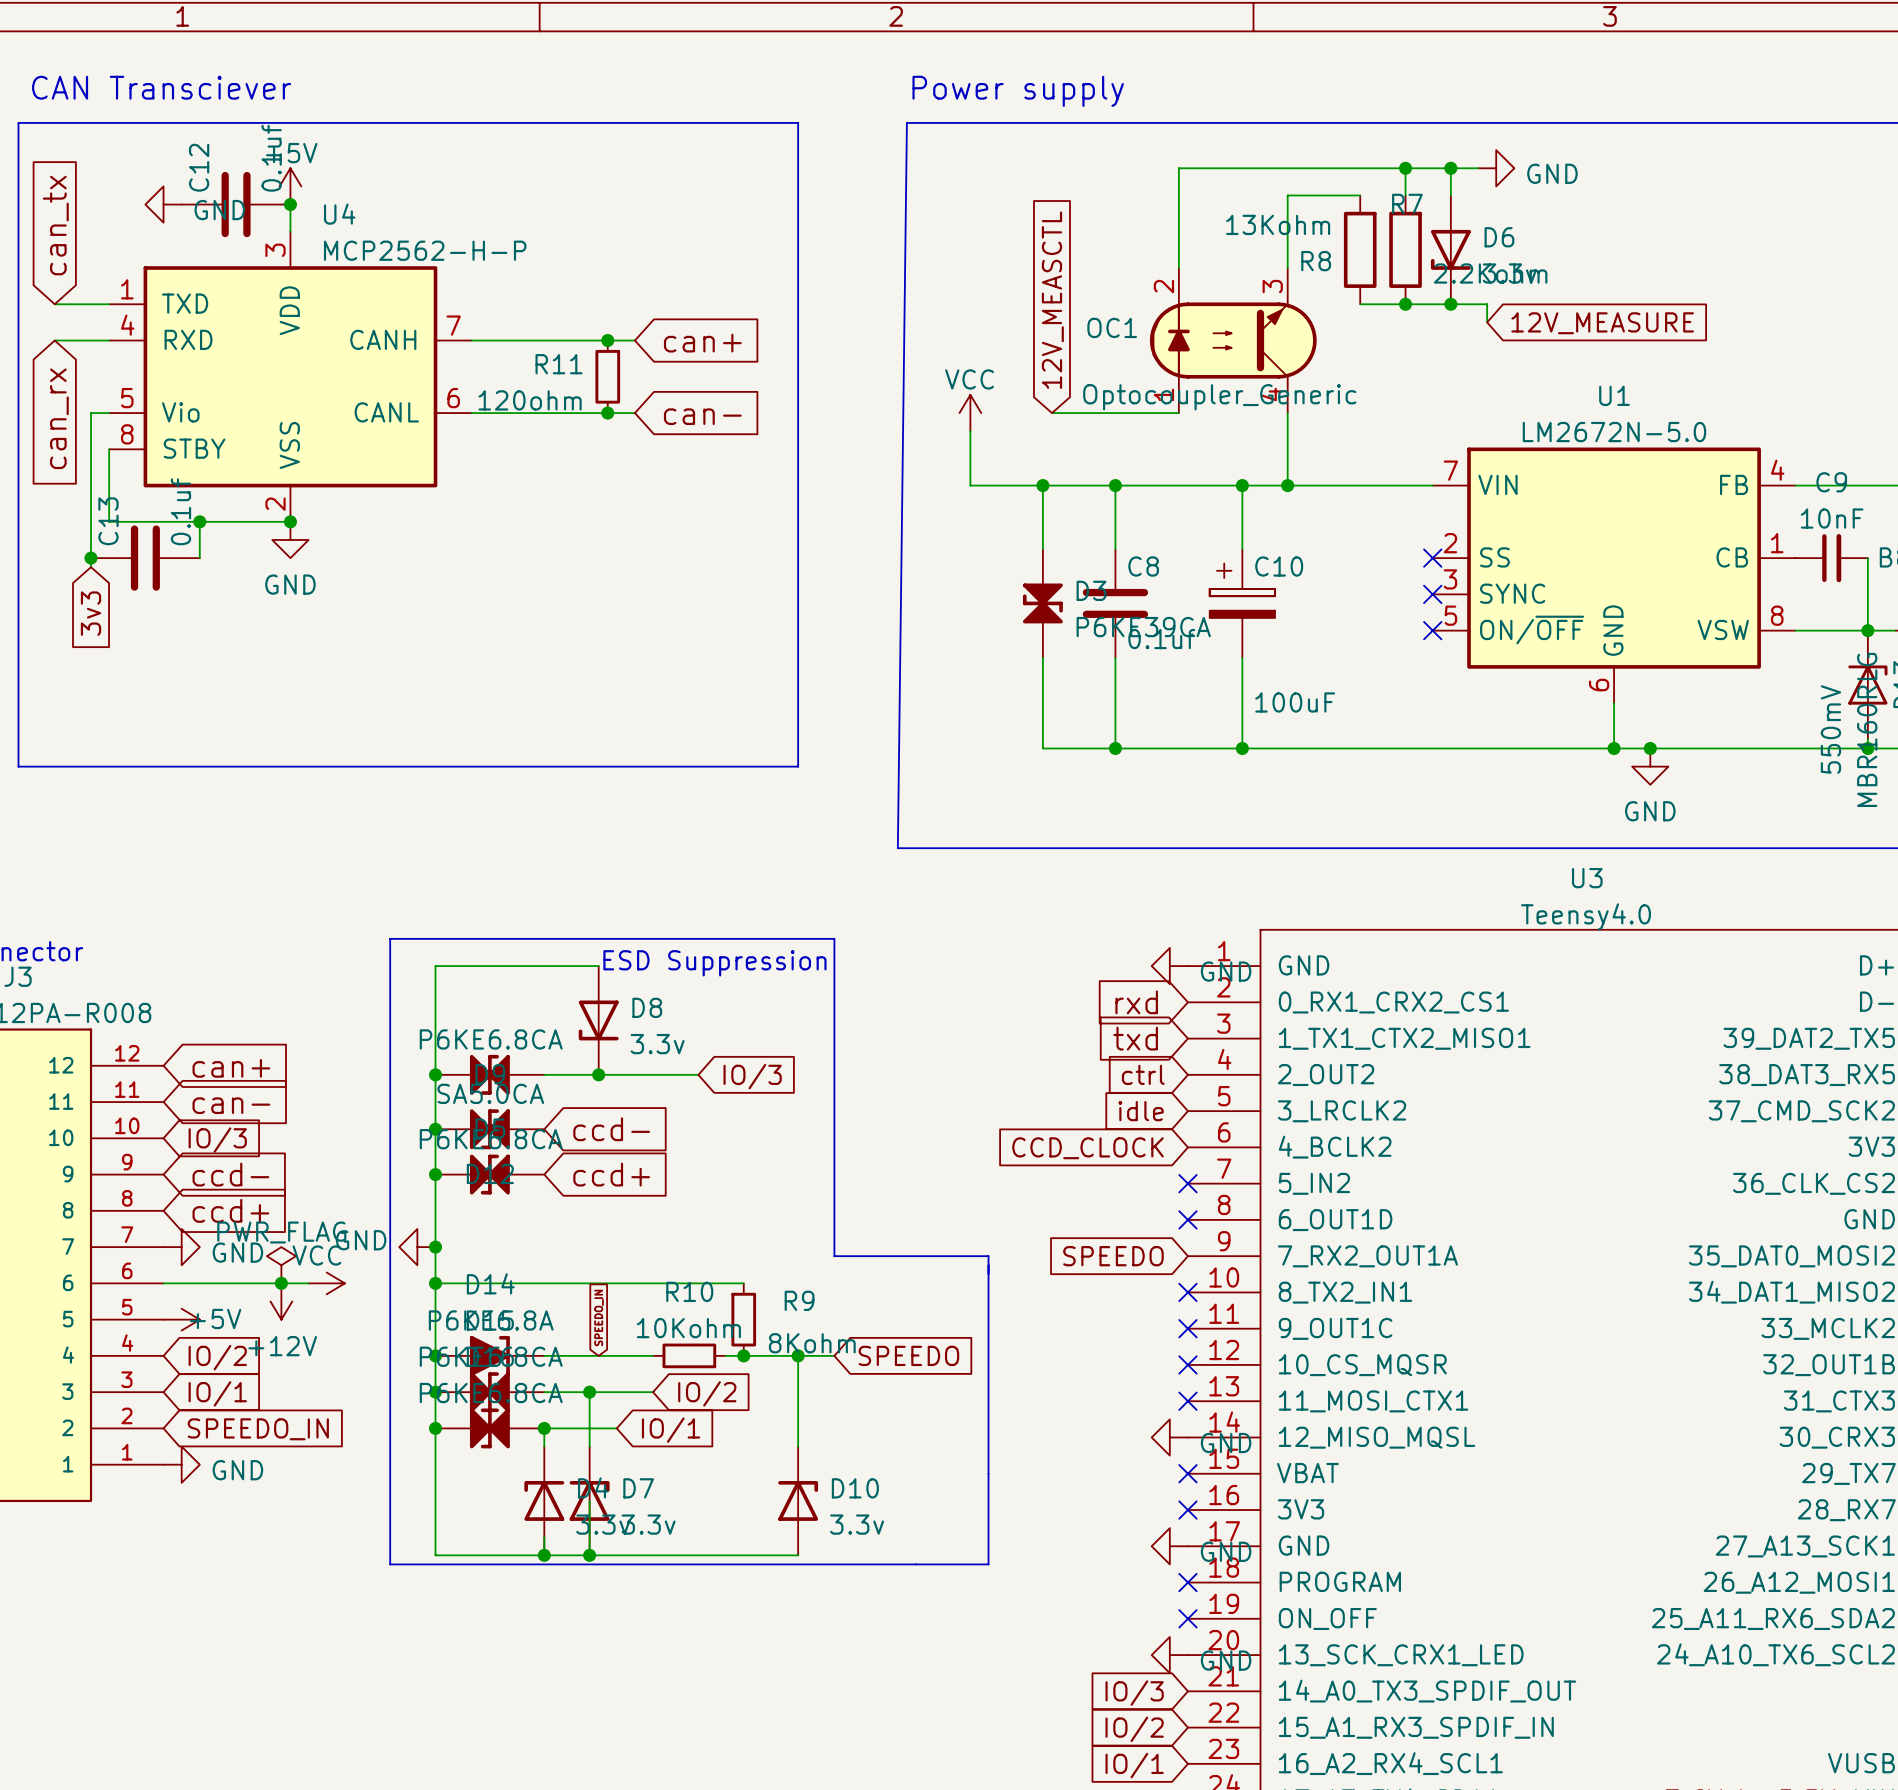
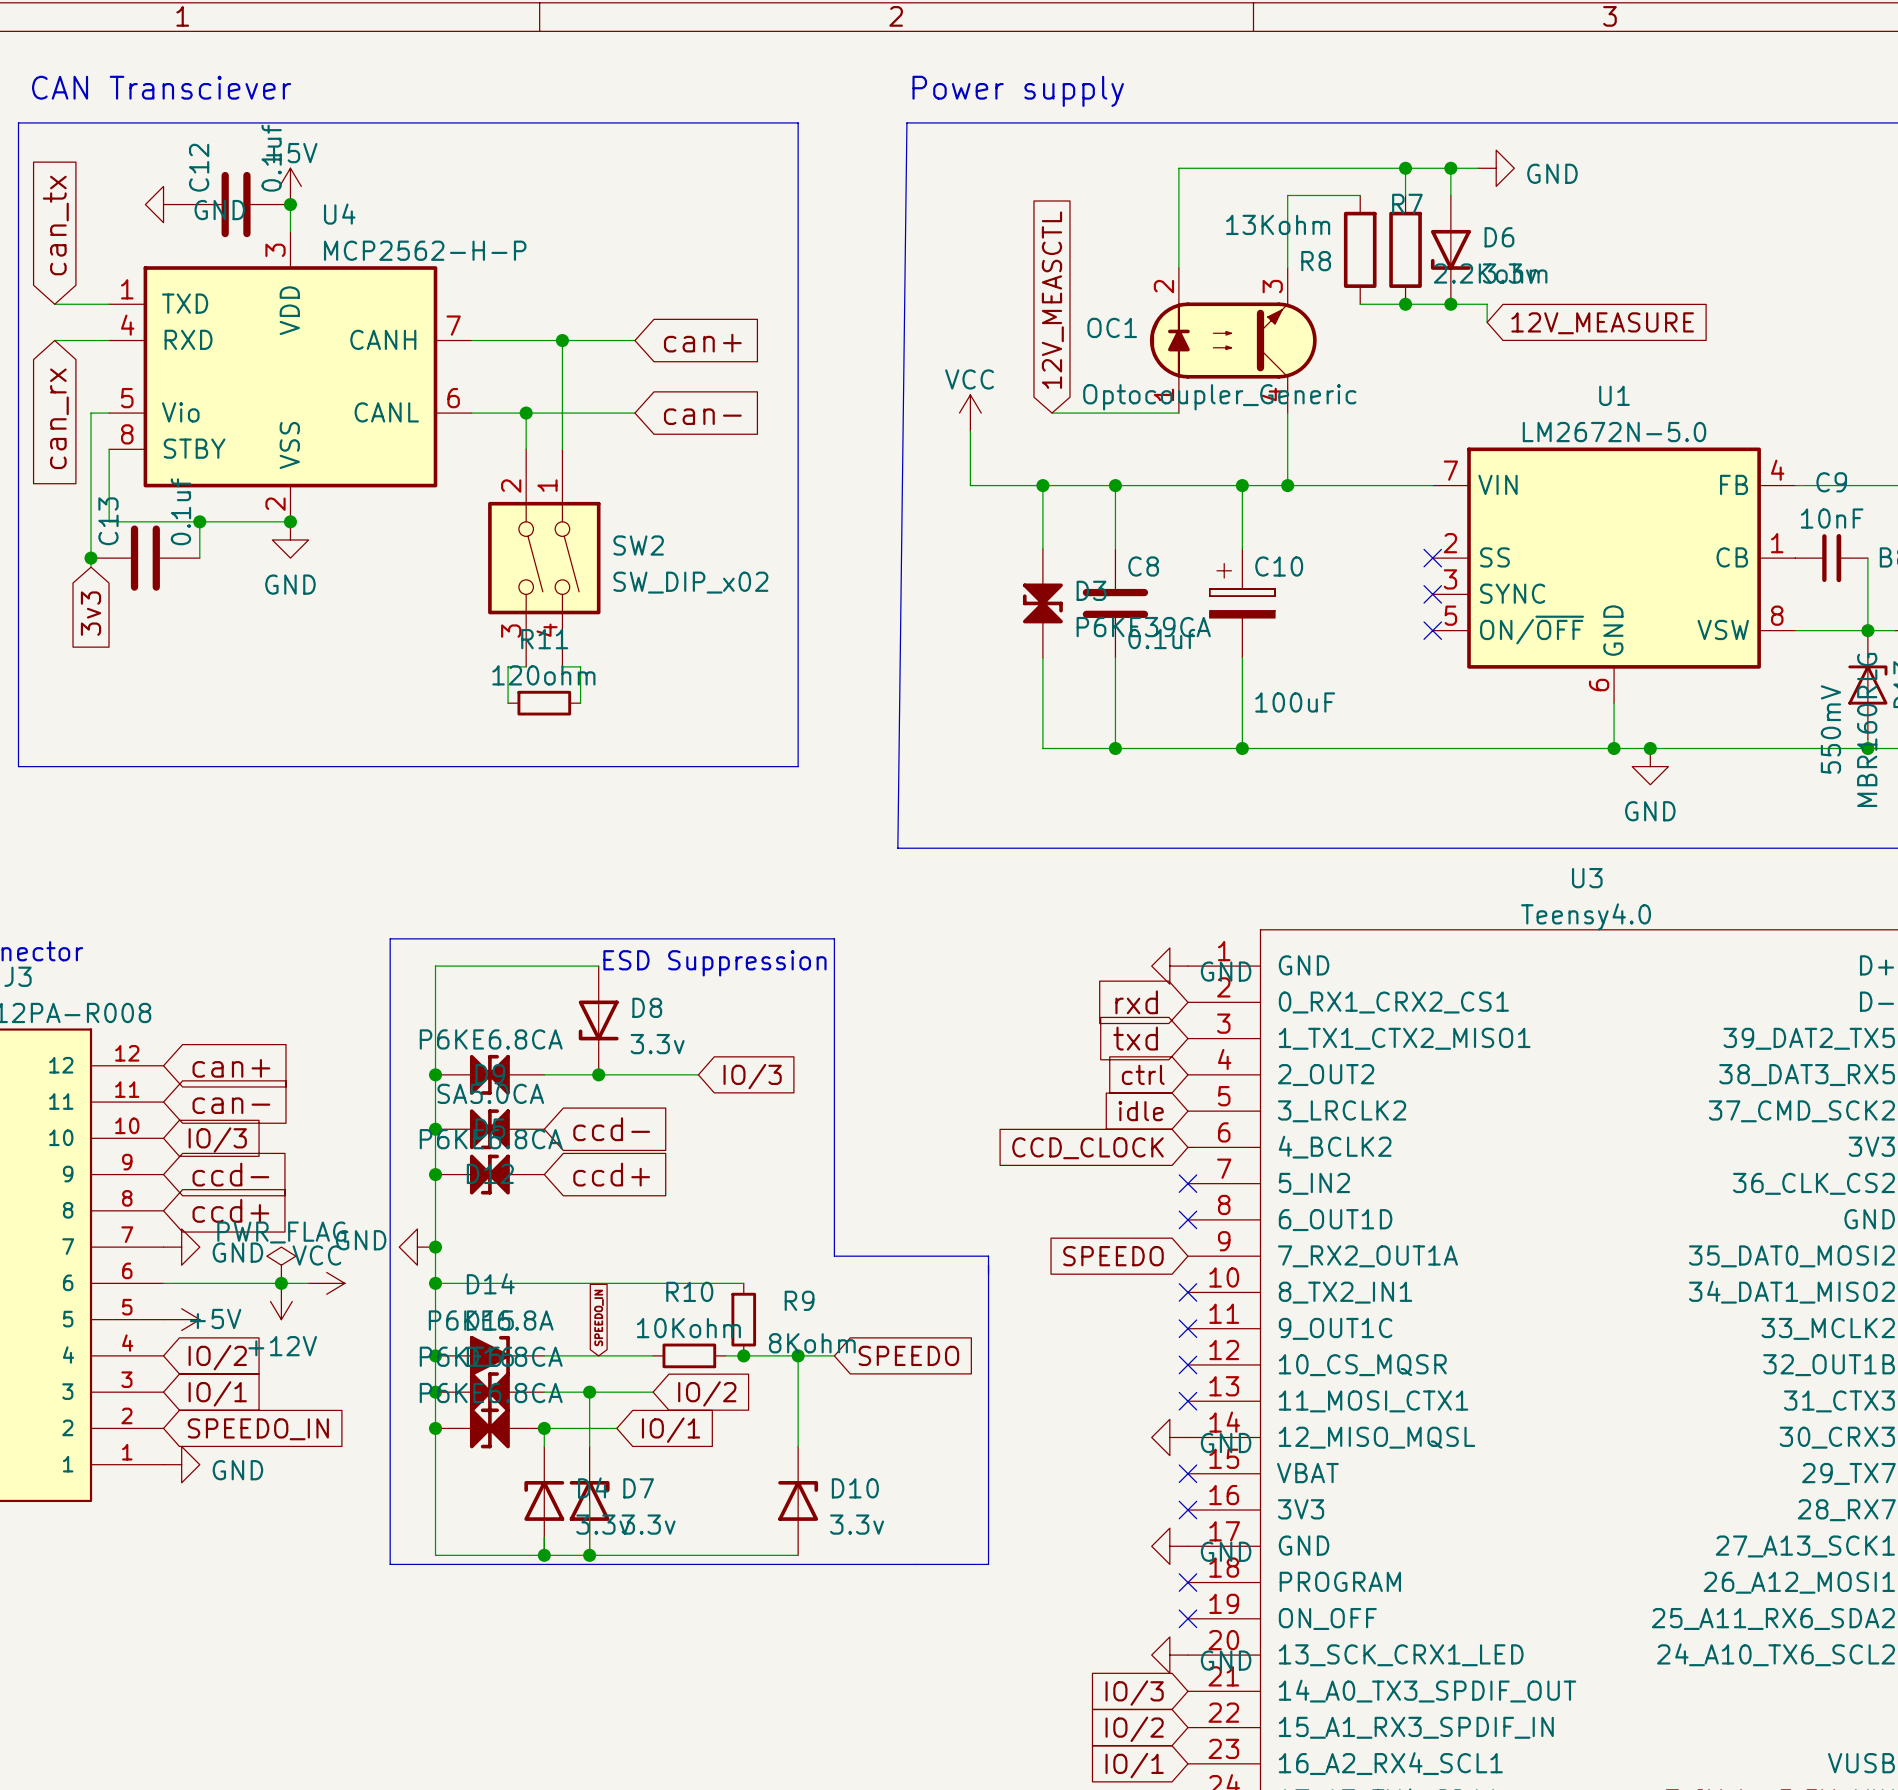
wire: none -> (562, 340) (562, 449)
junction: none -> (562, 340)
junction: (607, 340) -> none
R11 rotation: 0° (607, 376) -> 90° clockwise (544, 703)
R11 position: (607, 376) -> (544, 703)
R11 value position: 120ohm (530, 400) -> 120ohm (543, 675)
wire: none -> (526, 413) (526, 449)
junction: none -> (526, 413)
junction: (607, 413) -> none
SW2: none -> SW_DIP_x02 (544, 558)
wire: none -> (526, 666) (508, 666) (508, 703)
wire: none -> (562, 666) (580, 666) (580, 703)

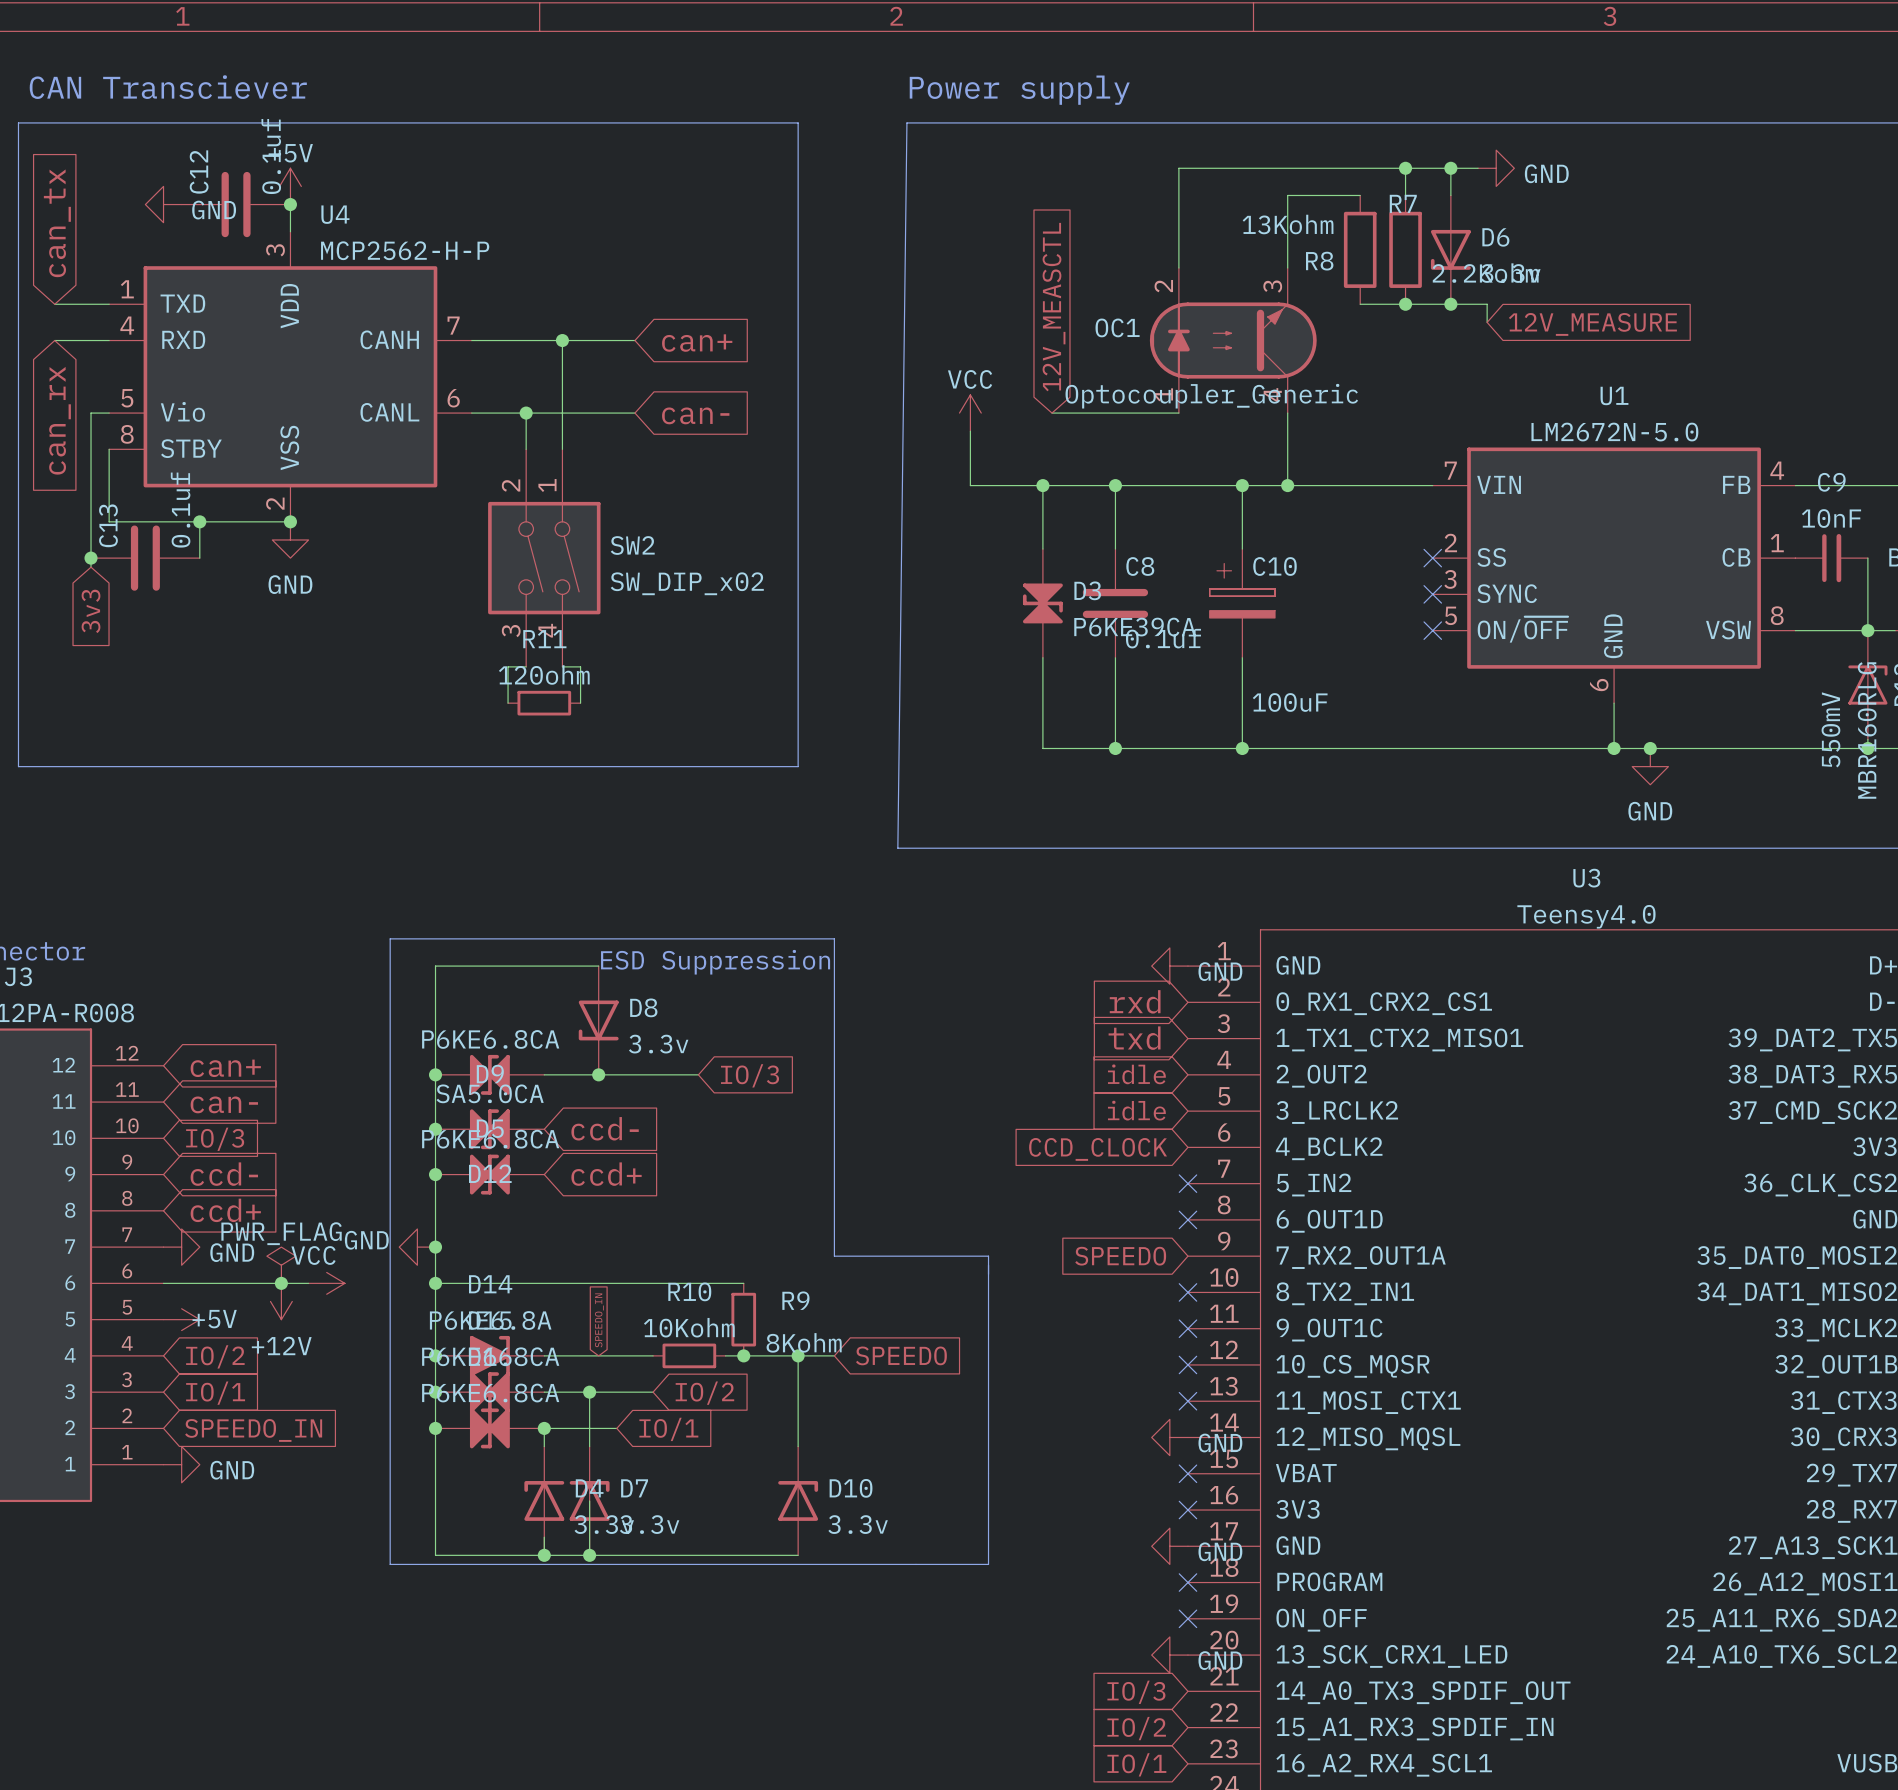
global label: ctrl (1143, 1074) -> idle (1136, 1074)

